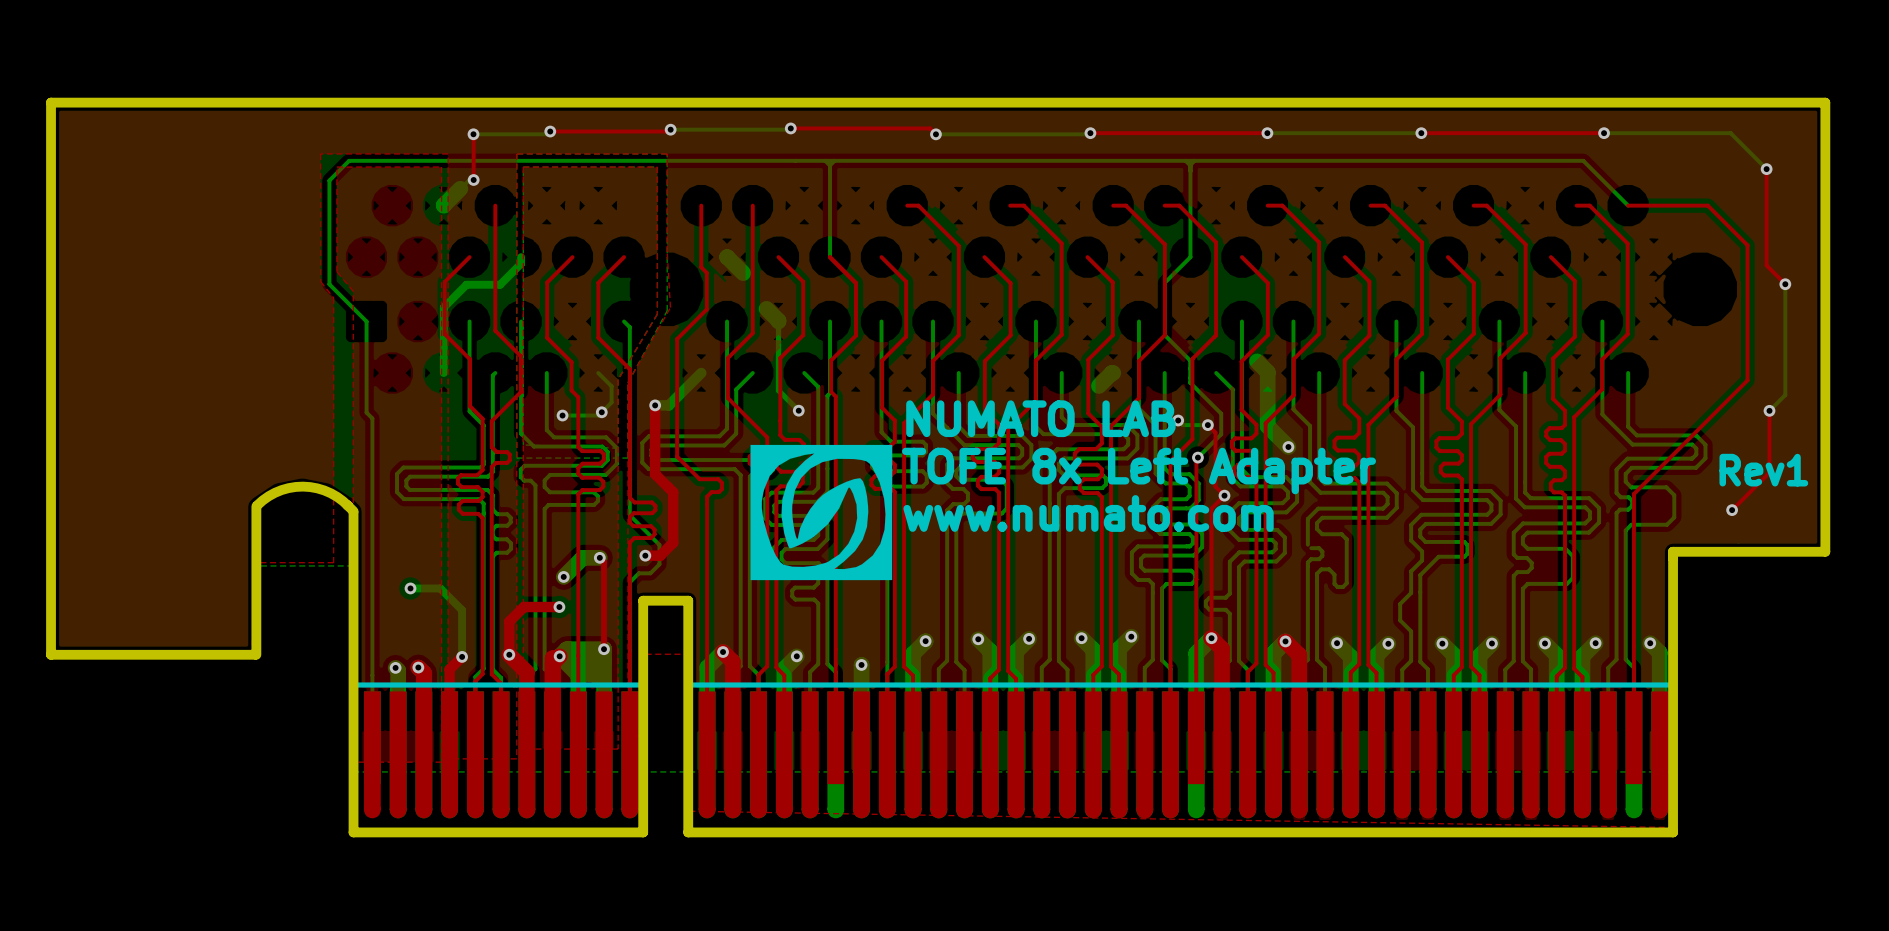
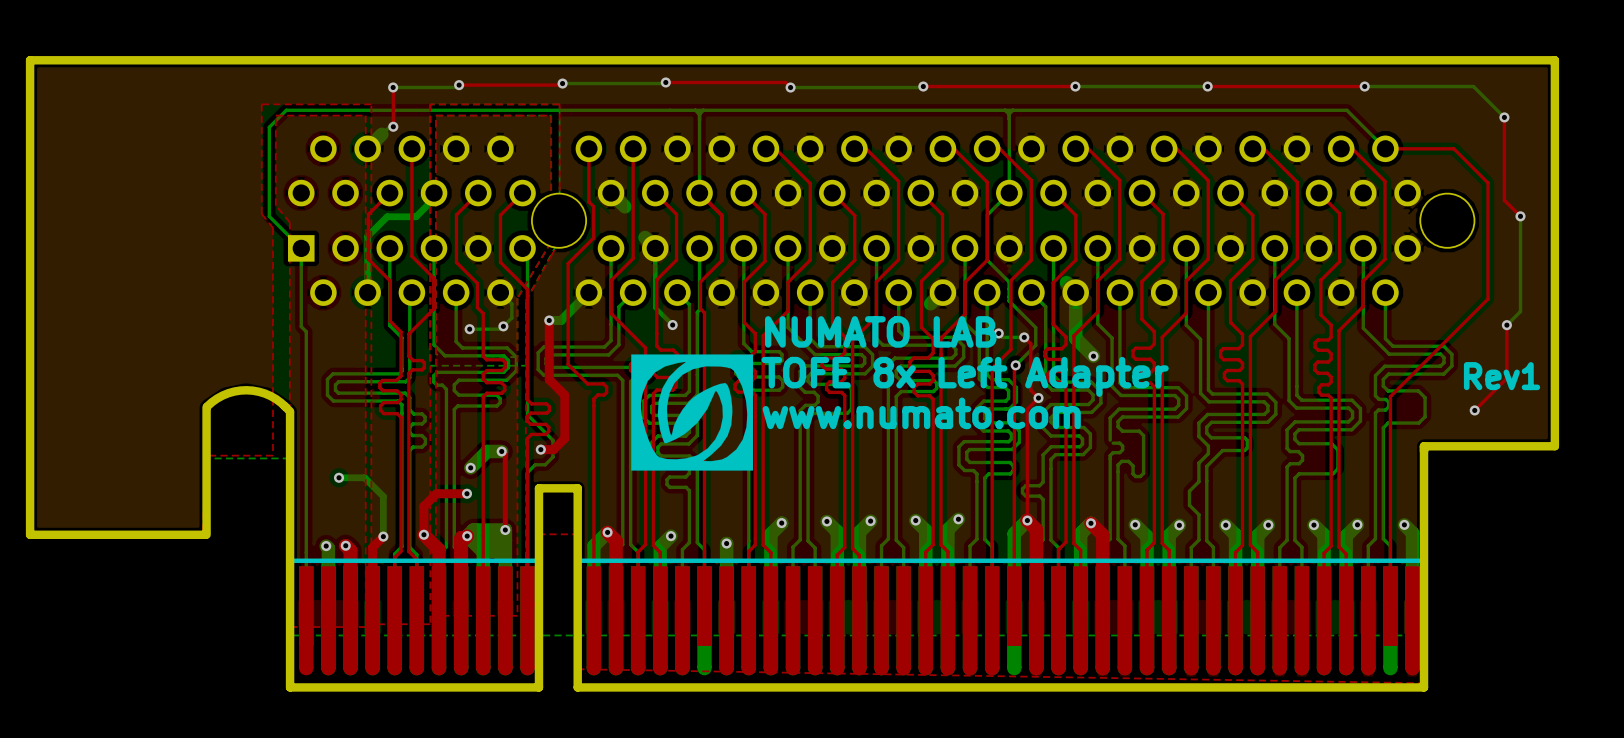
part: none -> (881, 220)

